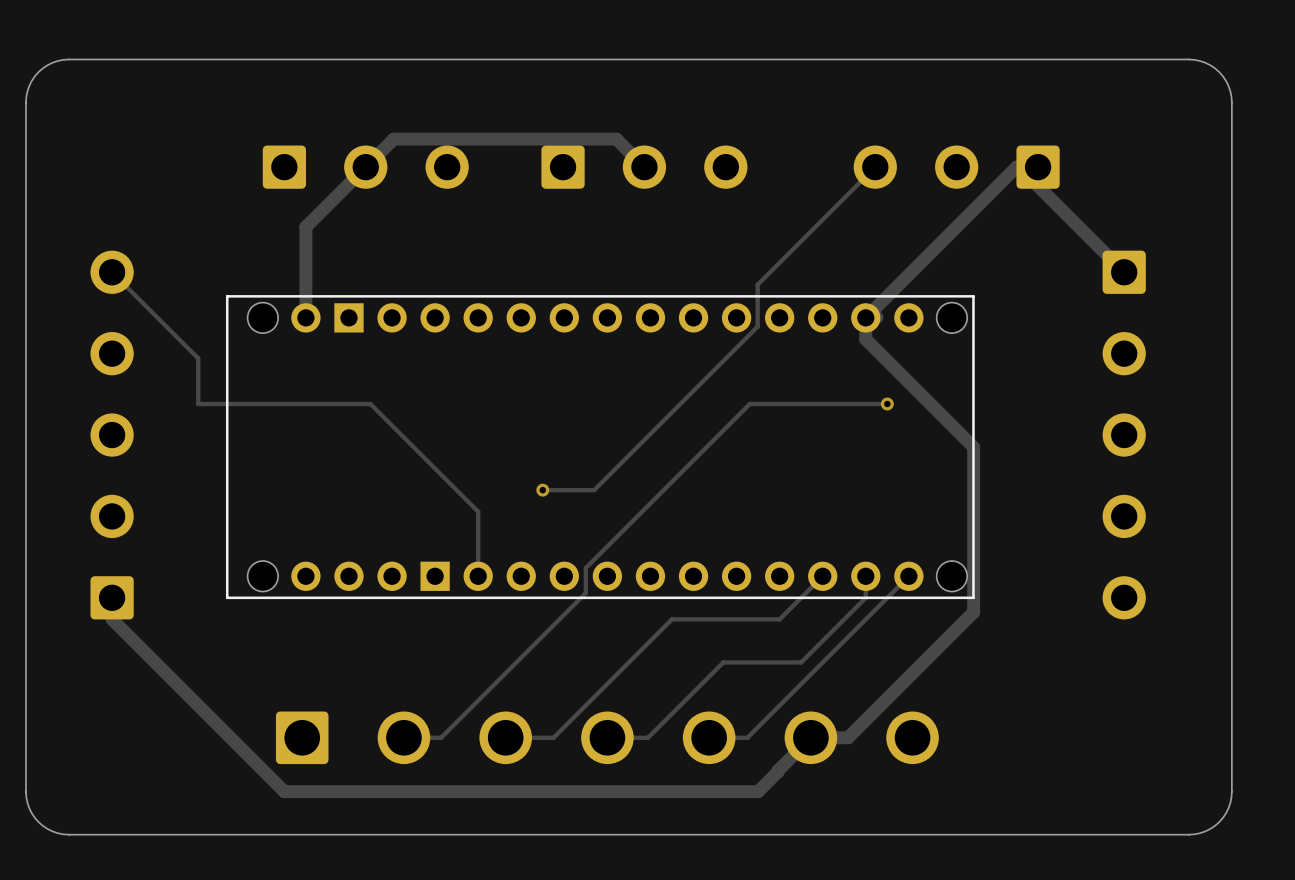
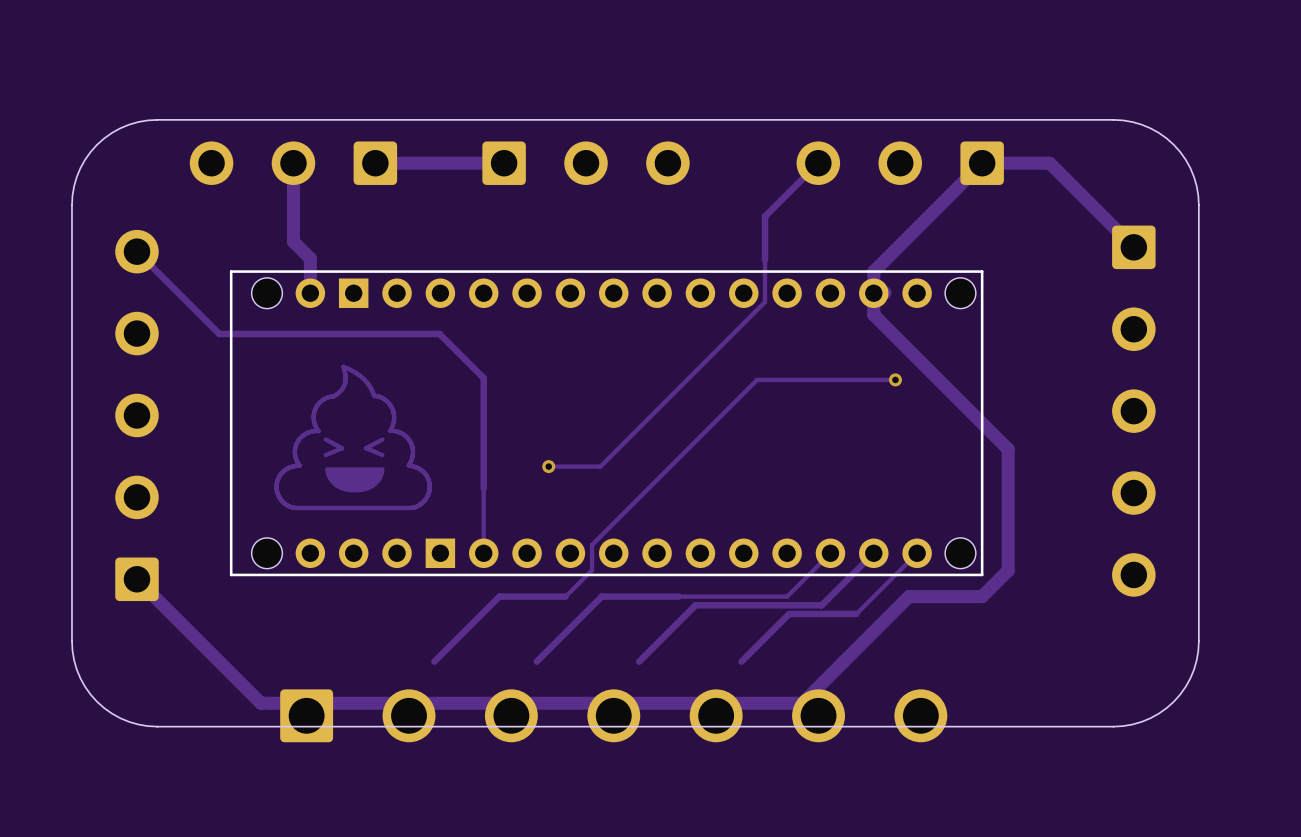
board edge: (69, 59) (1188, 59) (1210, 65) (1226, 81) (1231, 102) (1231, 791) (1226, 813) (1210, 828) (1188, 834) (69, 834) (47, 828) (31, 813) (25, 791) (25, 102) (29, 86) (38, 72) (52, 62) (69, 59) -> (157, 119) (129, 124) (104, 138) (85, 159) (76, 177) (72, 195) (72, 650) (76, 669) (90, 694) (104, 708) (120, 718) (138, 724) (157, 726) (1113, 726) (1141, 721) (1158, 713) (1180, 694) (1190, 678) (1196, 660) (1198, 641) (1198, 195) (1194, 177) (1185, 159) (1166, 138) (1150, 128) (1132, 122) (1113, 119) (157, 119)
part rotation: 0° (365, 167) -> 180° (293, 163)
track: (644, 167) (616, 139) (393, 139) (305, 226) (305, 283) -> (293, 163) (293, 241) (310, 258)
part position: (644, 167) -> (586, 163)
track: (875, 167) (757, 284) -> (818, 163) (765, 216) (765, 259)
part position: (956, 167) -> (900, 163)
track: none -> (375, 163) (504, 163)
track: (1040, 188) (1038, 186) (1038, 167) (1016, 167) (865, 317) -> (1049, 163) (982, 163) (873, 271) (873, 293)
track: (112, 272) (198, 358) (198, 404) (370, 404) (478, 511) -> (136, 251) (219, 333) (439, 333) (483, 378) (483, 488)
track: none -> (343, 366) (363, 378) (374, 396) (381, 397) (388, 403) (394, 416) (390, 430) (401, 433) (410, 442) (412, 453) (408, 465) (422, 471) (429, 483) (427, 496) (418, 505) (410, 507) (295, 507) (286, 505) (279, 497) (276, 486) (280, 475) (287, 468) (299, 465) (294, 453) (297, 441) (307, 433) (318, 431) (313, 419) (316, 407) (323, 399) (337, 393) (343, 386) (345, 377) (343, 366)
part position: (112, 435) -> (136, 415)
track: (973, 447) (973, 612) (848, 737) (810, 737) (758, 791) (284, 791) (112, 619) (112, 597) -> (982, 423) (1008, 449) (1008, 570) (982, 596) (908, 596) (802, 703) (260, 703) (136, 579)
track: none -> (325, 439) (342, 448) (325, 455)
track: none -> (382, 439) (366, 448) (382, 455)
drawing: none -> [325, 467, 385, 493]
track: (865, 576) (865, 597) (801, 662) (723, 662) (648, 737) (607, 737) -> (873, 553) (821, 605) (695, 605) (639, 661)
track: (559, 619) (441, 737) (403, 737) -> (565, 596) (499, 596) (434, 661)
track: (671, 619) (553, 737) (505, 737) -> (678, 596) (601, 596) (536, 661)
track: (848, 636) (747, 737) (709, 737) -> (856, 613) (789, 613) (741, 661)

